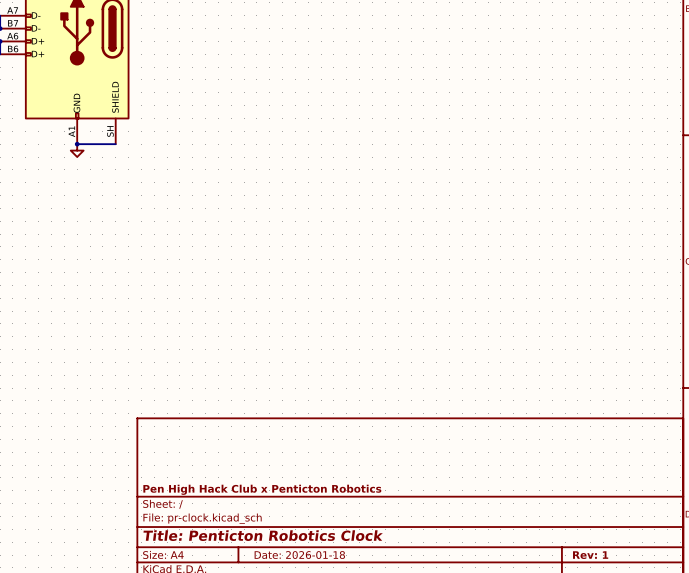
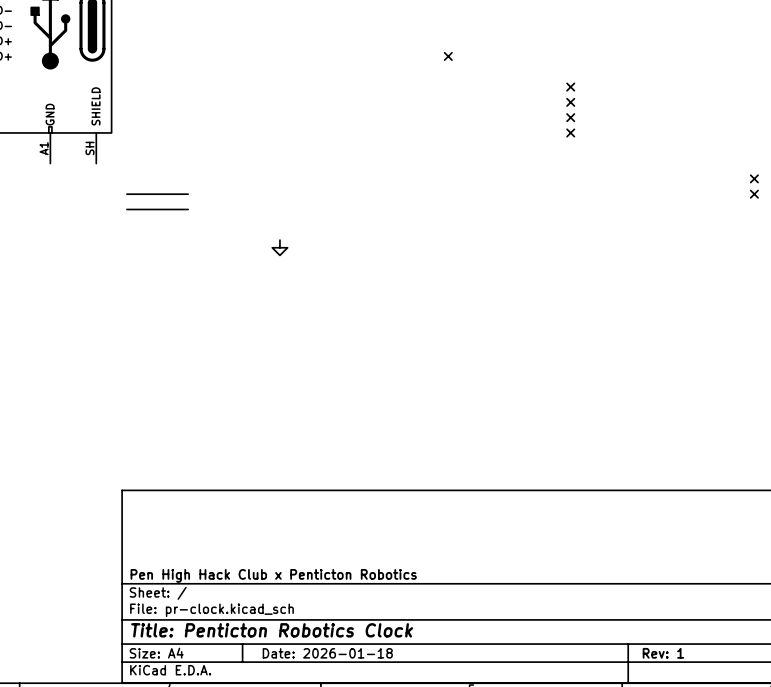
no-connect mark: none -> (448, 56)
no-connect mark: none -> (570, 87)
no-connect mark: none -> (570, 102)
no-connect mark: none -> (570, 117)
no-connect mark: none -> (570, 132)
wire: (77, 144) (115, 144) -> none
junction: (77, 144) -> none
power symbol: (77, 150) -> none
no-connect mark: none -> (754, 178)
wire: none -> (126, 194) (188, 194)
no-connect mark: none -> (754, 194)
wire: none -> (126, 209) (188, 209)
power symbol: none -> (279, 247)

